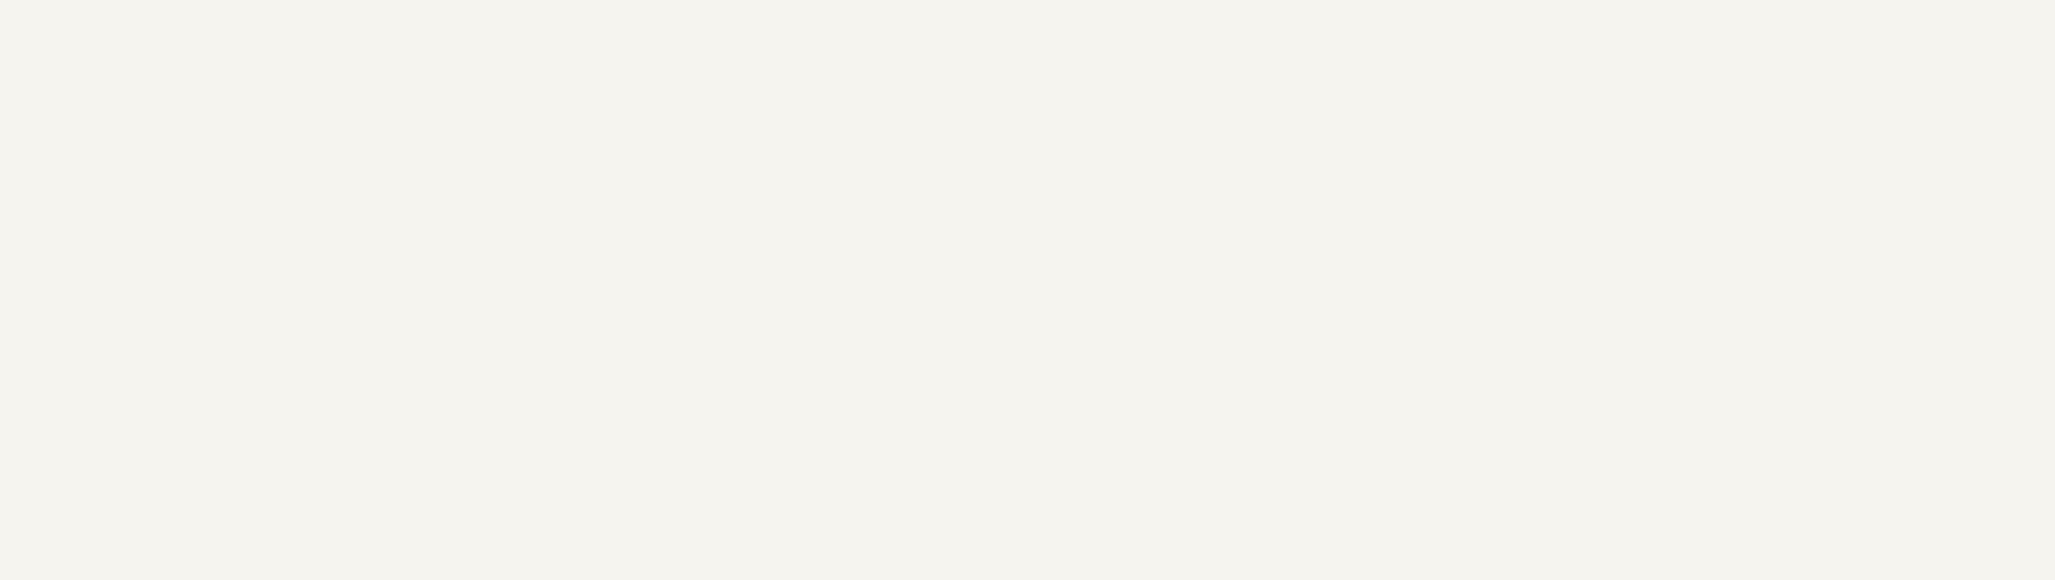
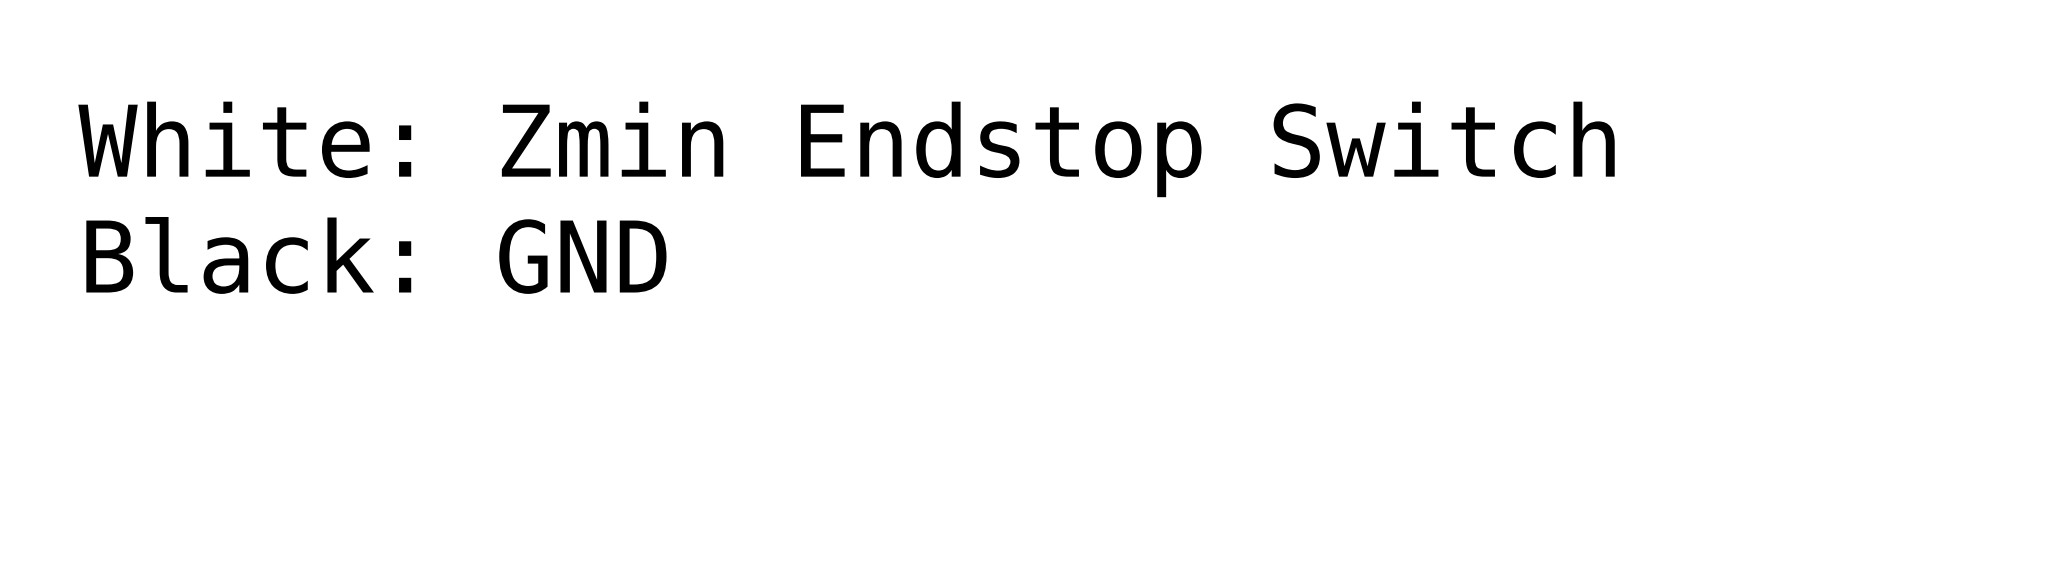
text: none -> White: Zmin Endstop Switch (846, 149)
text: none -> Black: GND (376, 255)

